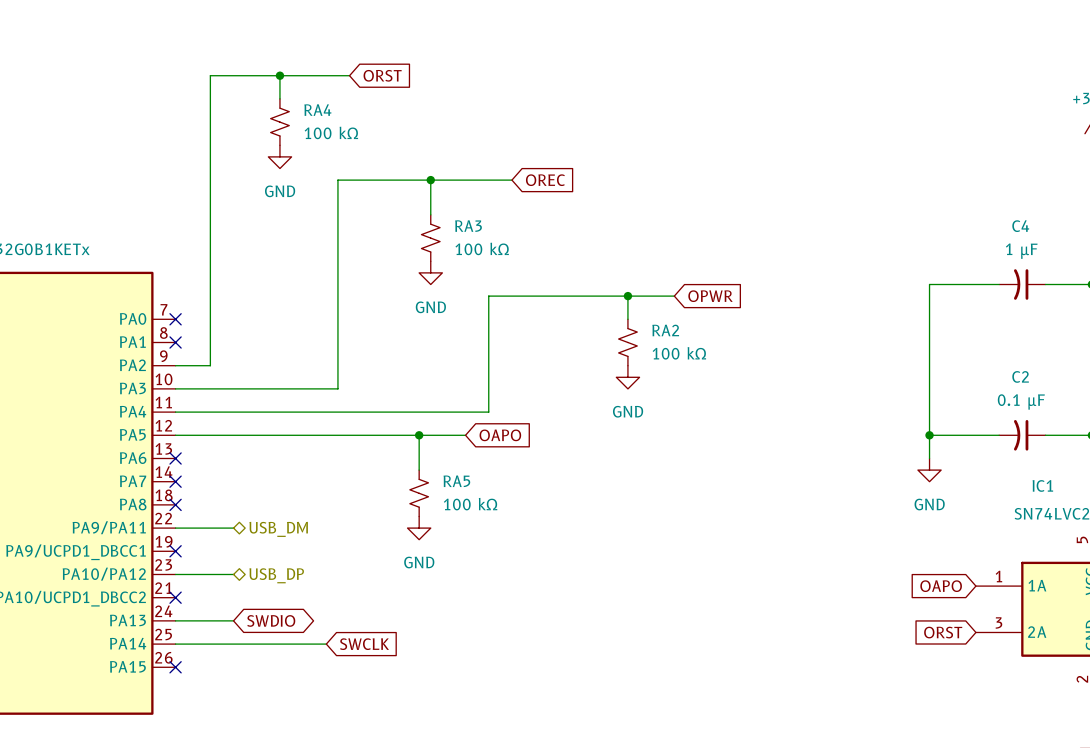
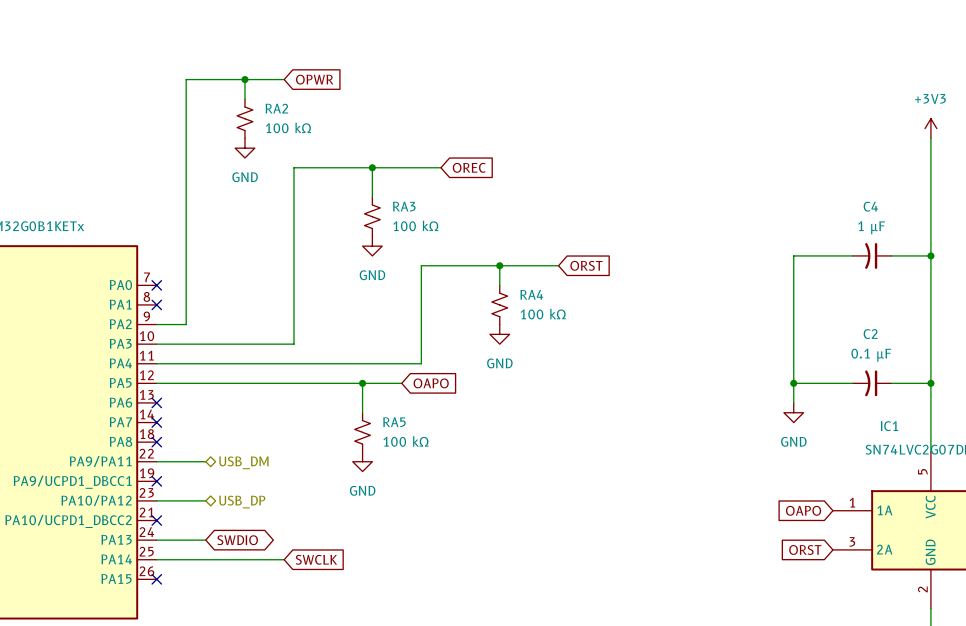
wire: (326, 75) (349, 75) -> none
global label: none -> OPWR (314, 79)
global label: ORST (382, 75) -> none
RA4 name: RA4 (317, 110) -> RA2 (276, 108)
wire: (627, 296) (627, 319) -> (499, 265) (499, 285)
junction position: (627, 296) -> (499, 265)
wire: (651, 296) (674, 296) -> none
global label: none -> ORST (586, 265)
global label: OPWR (710, 296) -> none
RA4: none -> 100 kΩ (499, 304)
RA2: 100 kΩ (627, 342) -> none
power symbol position: GND (627, 377) -> GND (499, 334)

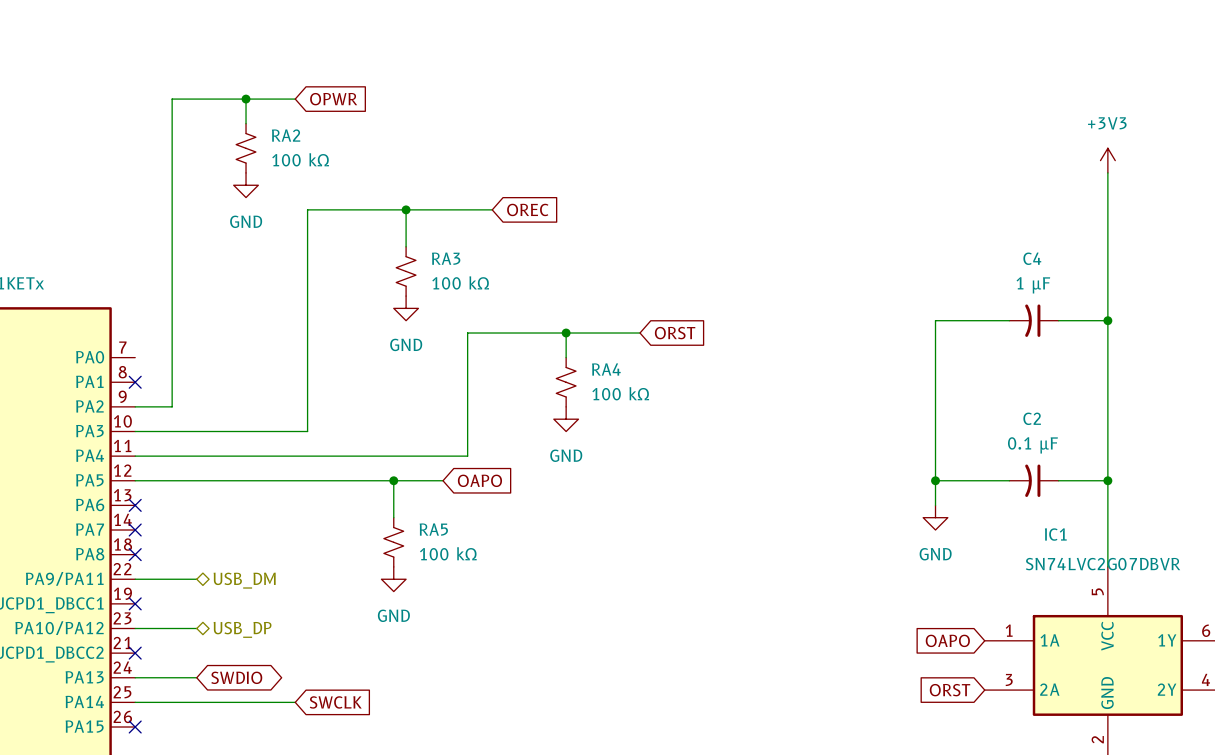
no-connect mark: (156, 285) -> none

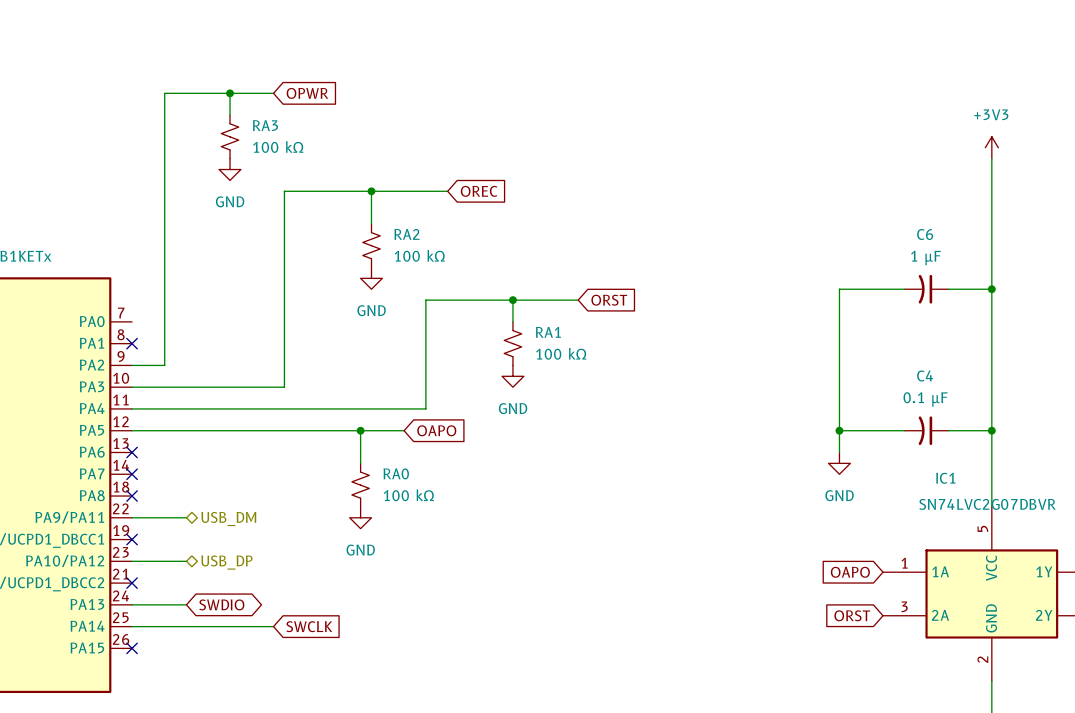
RA2 name: RA2 (286, 135) -> RA3 (265, 125)
RA3 name: RA3 (446, 258) -> RA2 (406, 234)
C4 name: C4 (1032, 258) -> C6 (925, 234)
RA4 name: RA4 (606, 369) -> RA1 (548, 332)
C2 name: C2 (1032, 418) -> C4 (925, 375)
RA5 name: RA5 (433, 529) -> RA0 (396, 473)

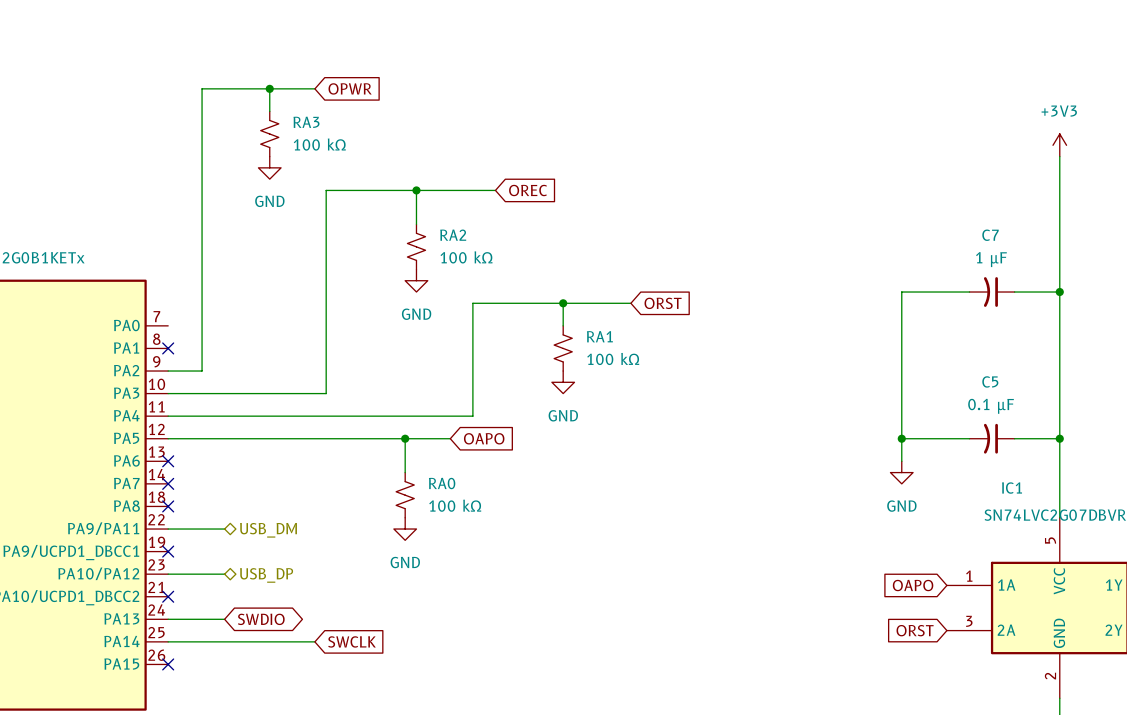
C6 name: C6 (925, 234) -> C7 (990, 235)
C4 name: C4 (925, 375) -> C5 (990, 381)

